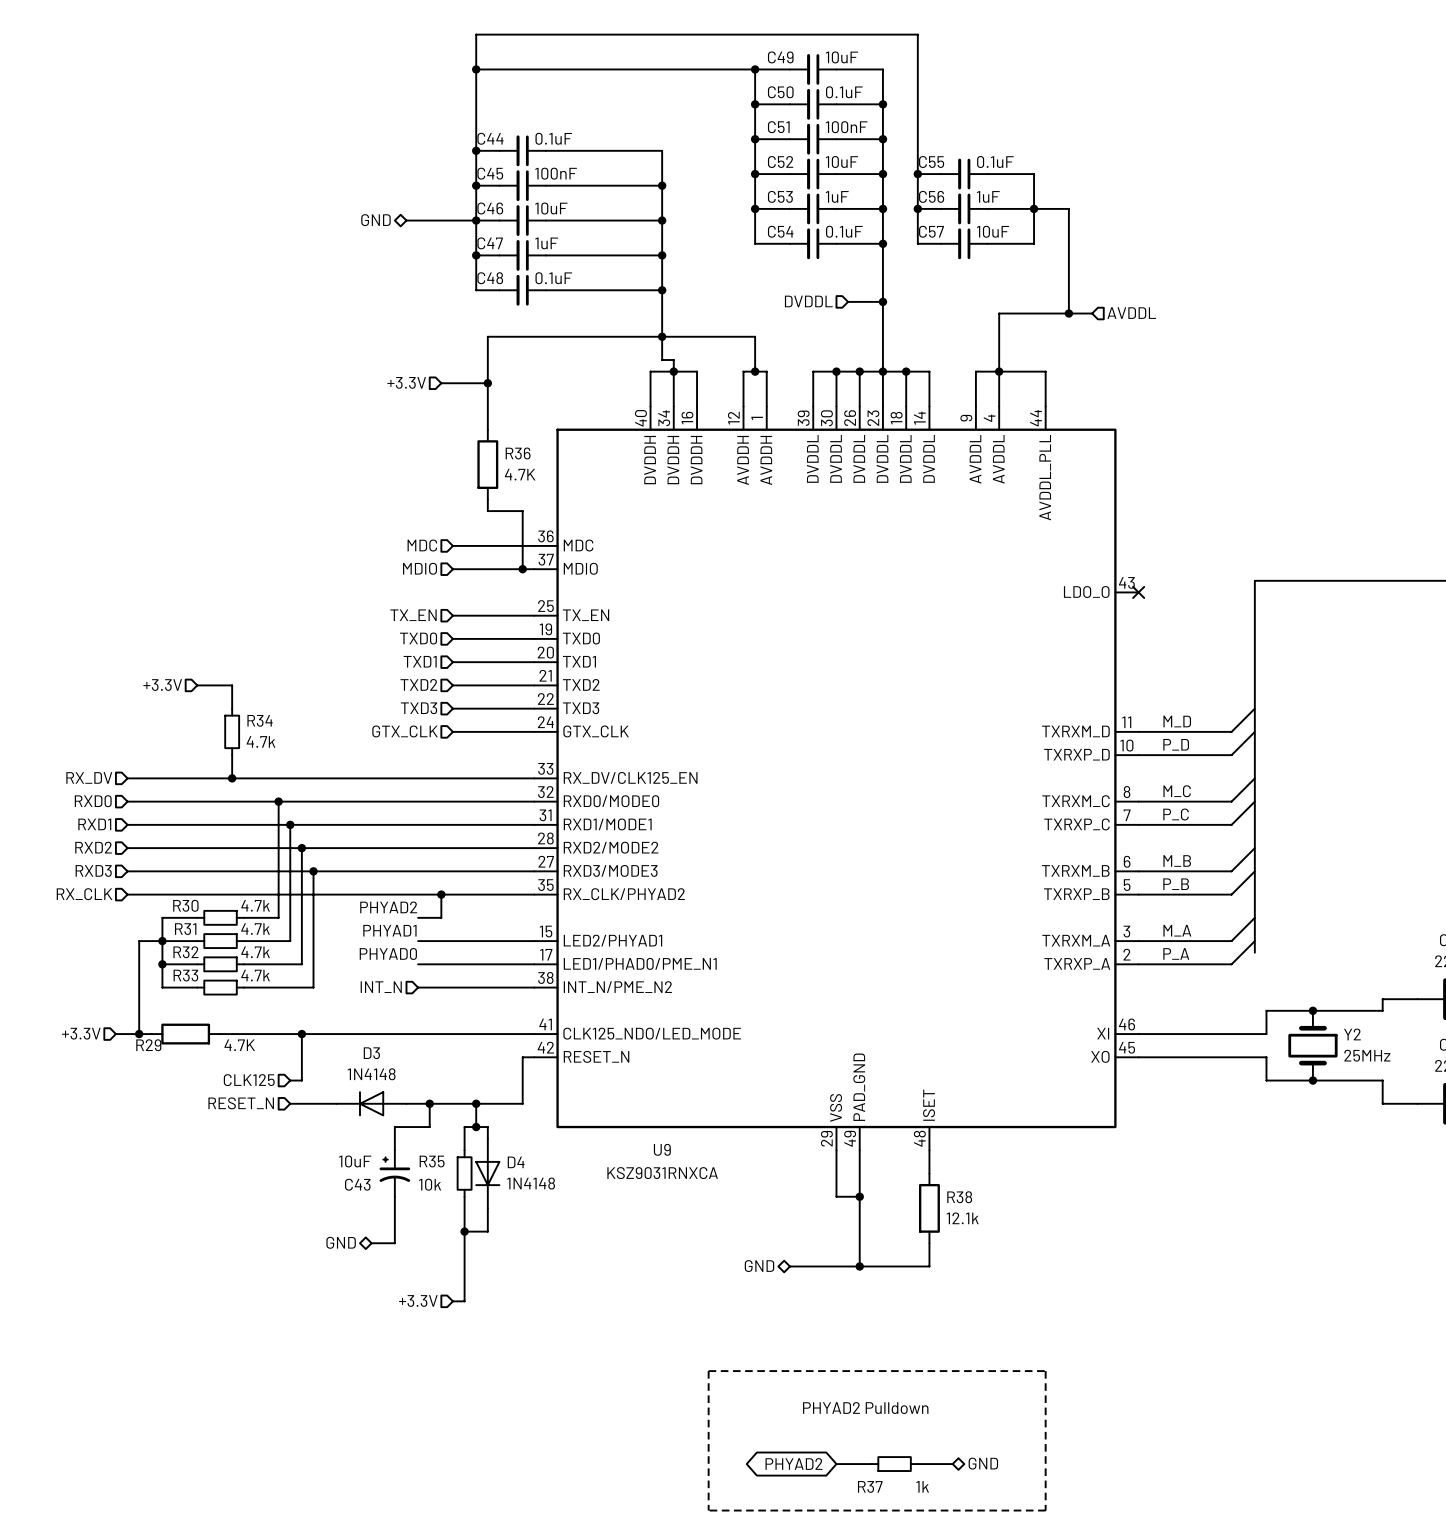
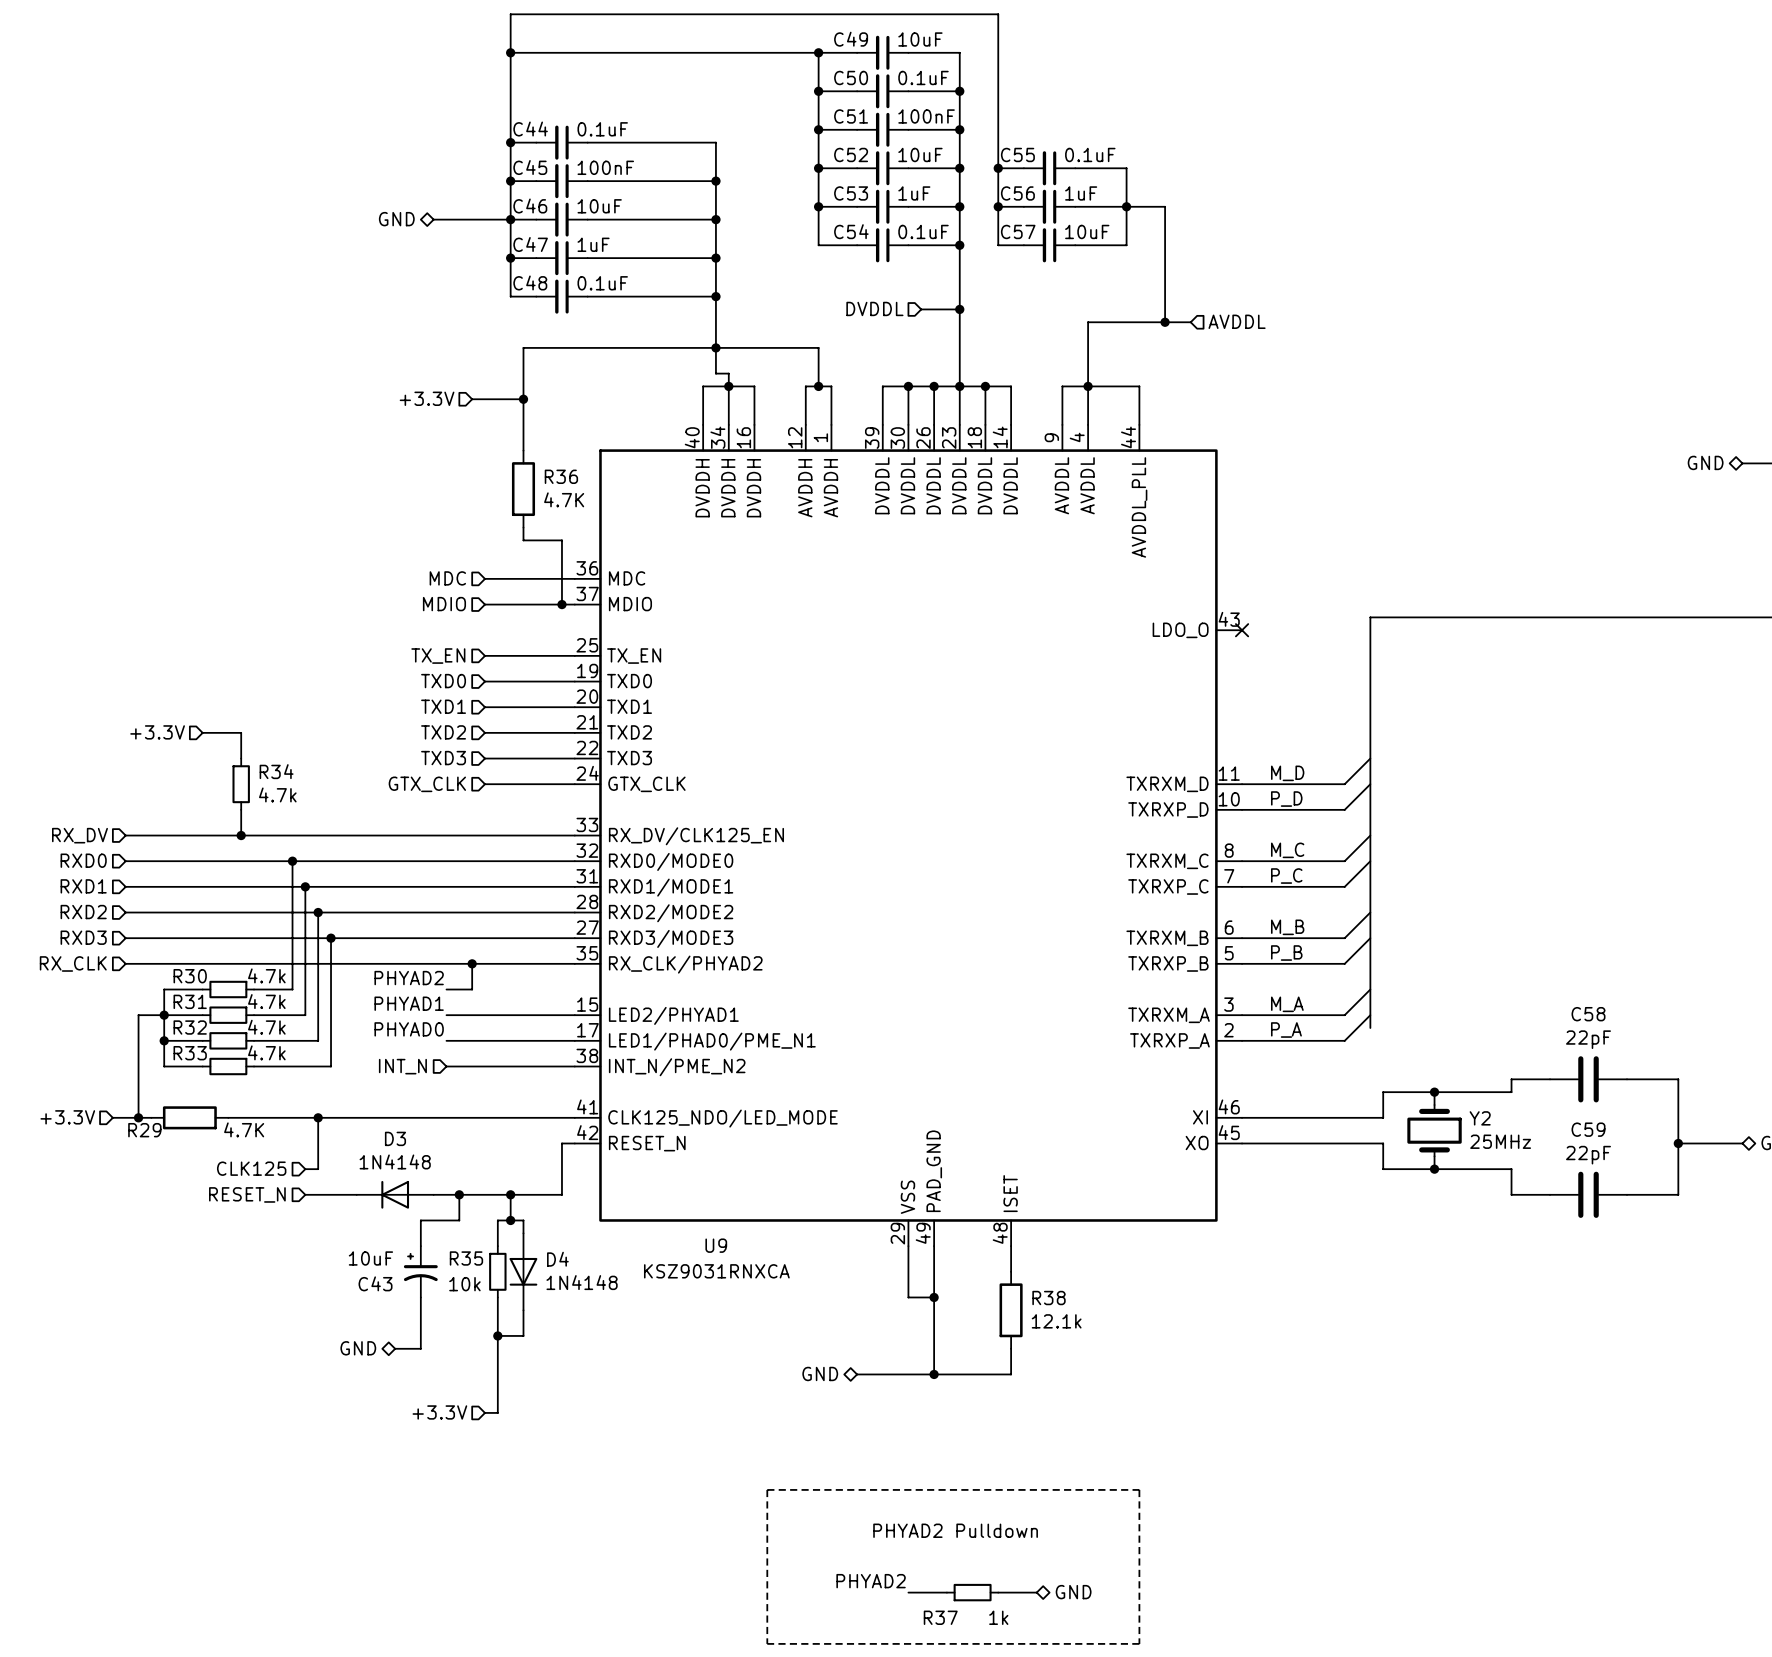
label: none -> PHYAD2 (871, 1581)
global label: PHYAD2 (793, 1463) -> none

